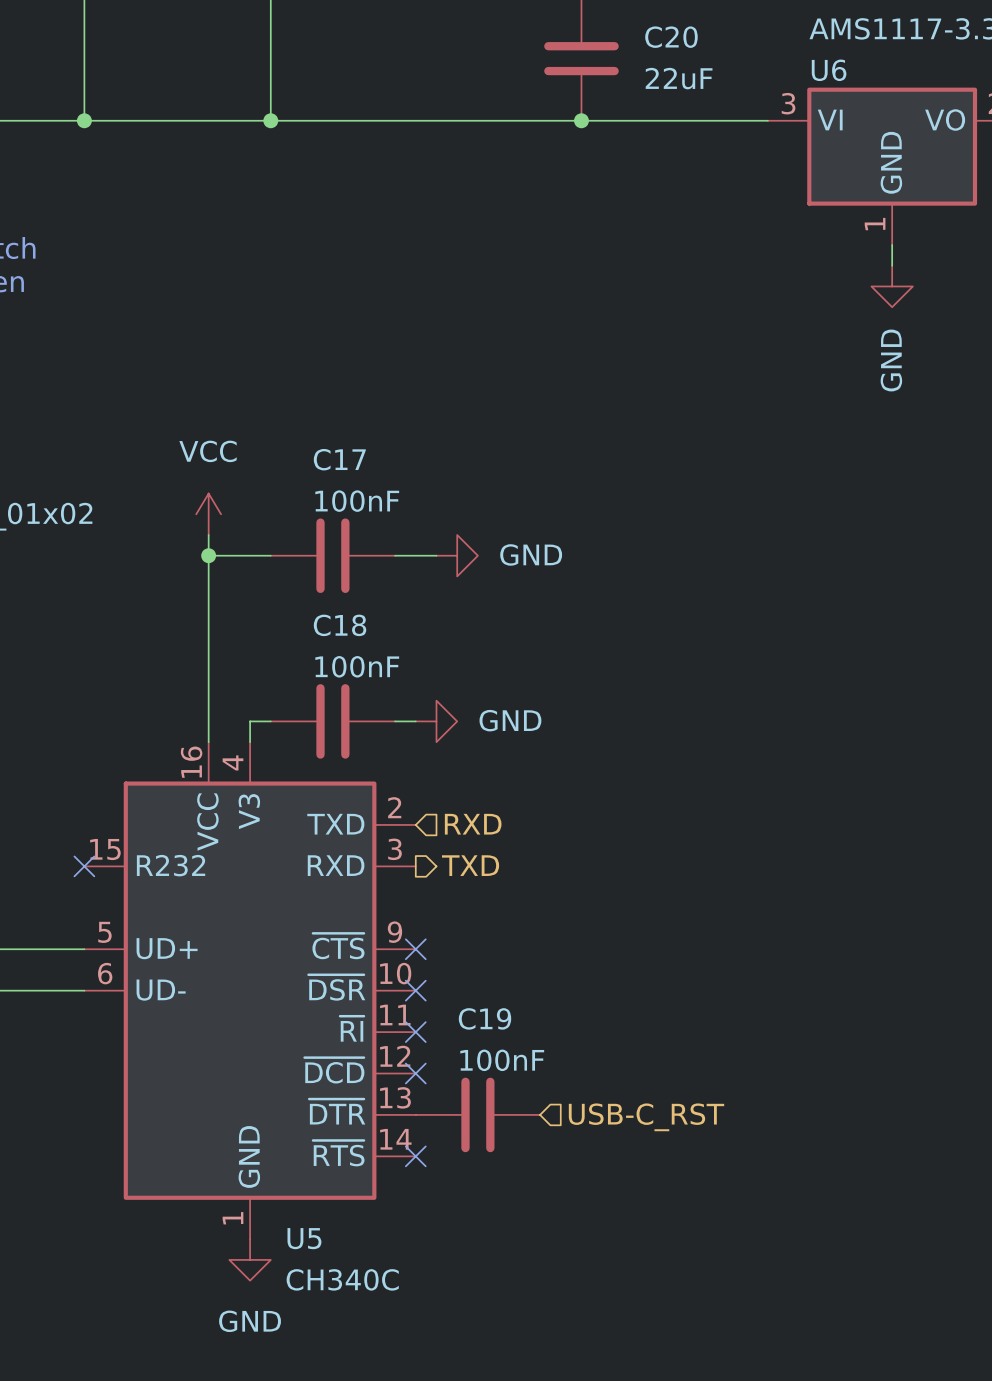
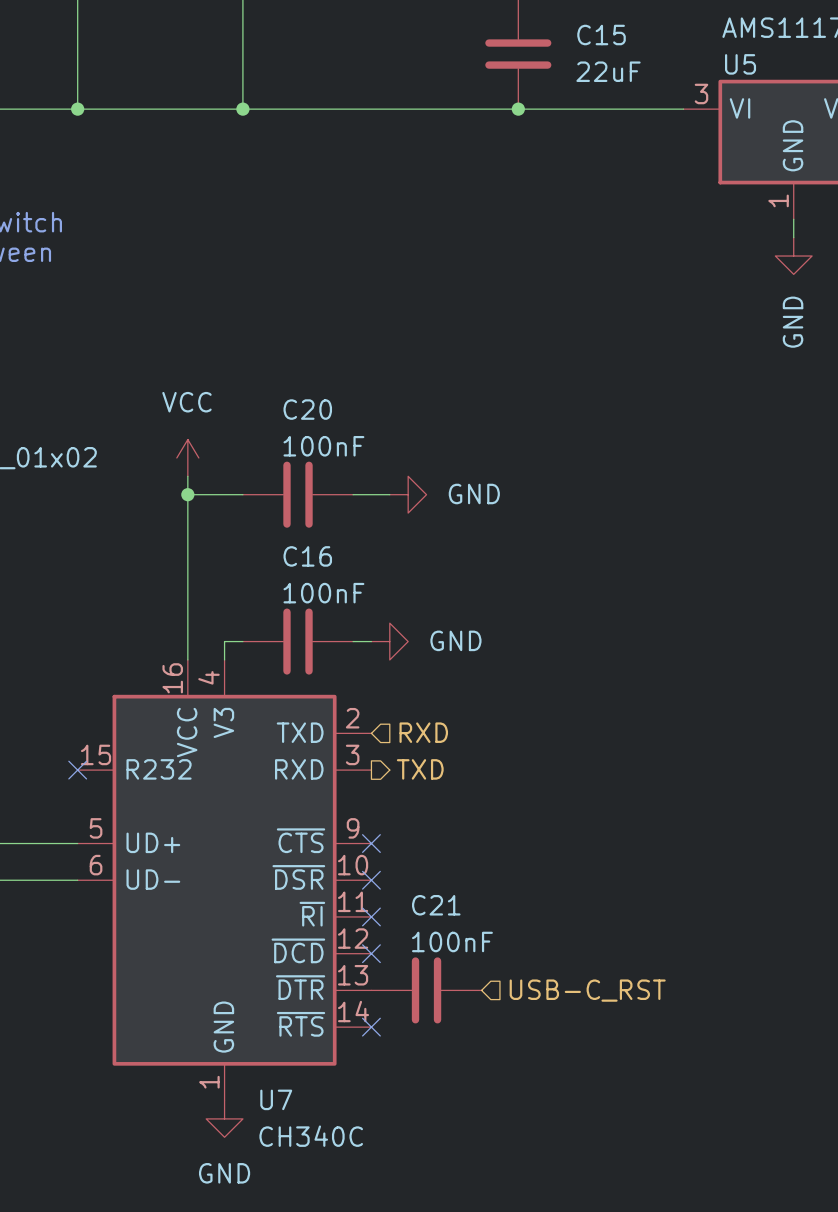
C20 name: C20 (671, 37) -> C15 (601, 35)
U6 name: U6 (829, 70) -> U5 (740, 64)
C17 name: C17 (339, 459) -> C20 (307, 409)
C18 name: C18 (340, 625) -> C16 (307, 556)
C19 name: C19 (484, 1018) -> C21 (436, 905)
U5 name: U5 (304, 1238) -> U7 (276, 1099)

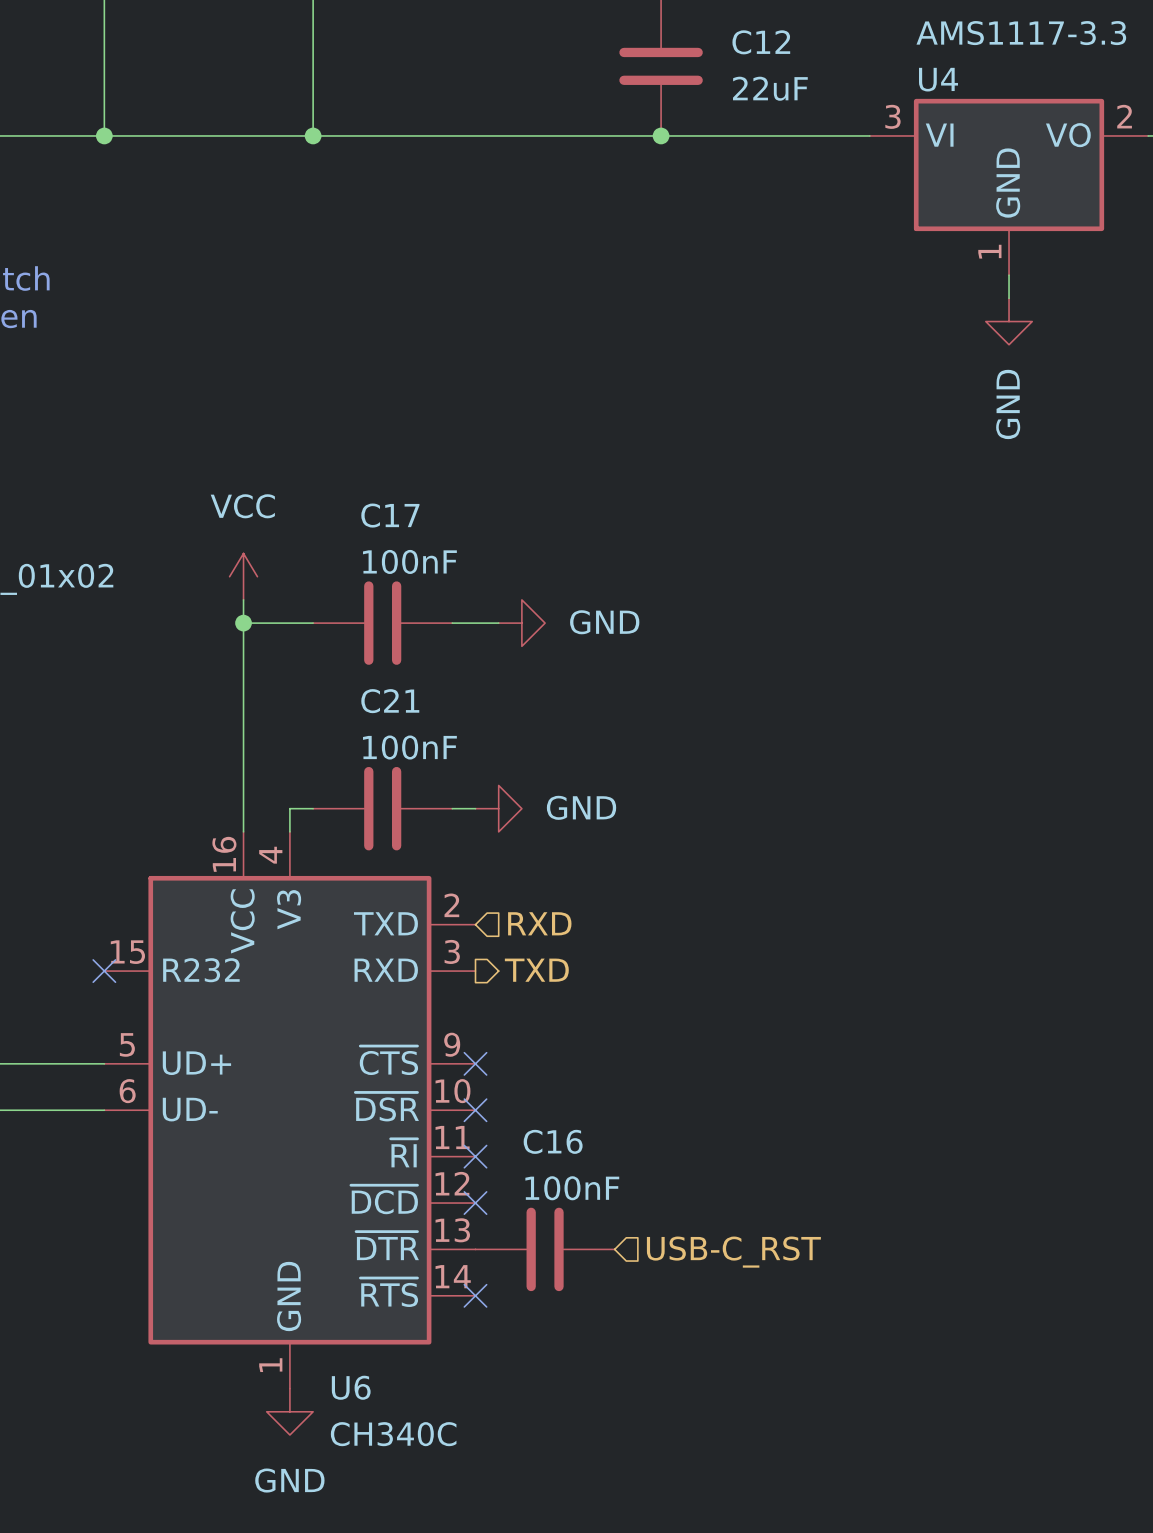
C15 name: C15 (601, 35) -> C12 (761, 42)
U5 name: U5 (740, 64) -> U4 (938, 79)
C20 name: C20 (307, 409) -> C17 (390, 515)
C16 name: C16 (307, 556) -> C21 (390, 701)
C21 name: C21 (436, 905) -> C16 (553, 1141)
U7 name: U7 (276, 1099) -> U6 (351, 1387)

